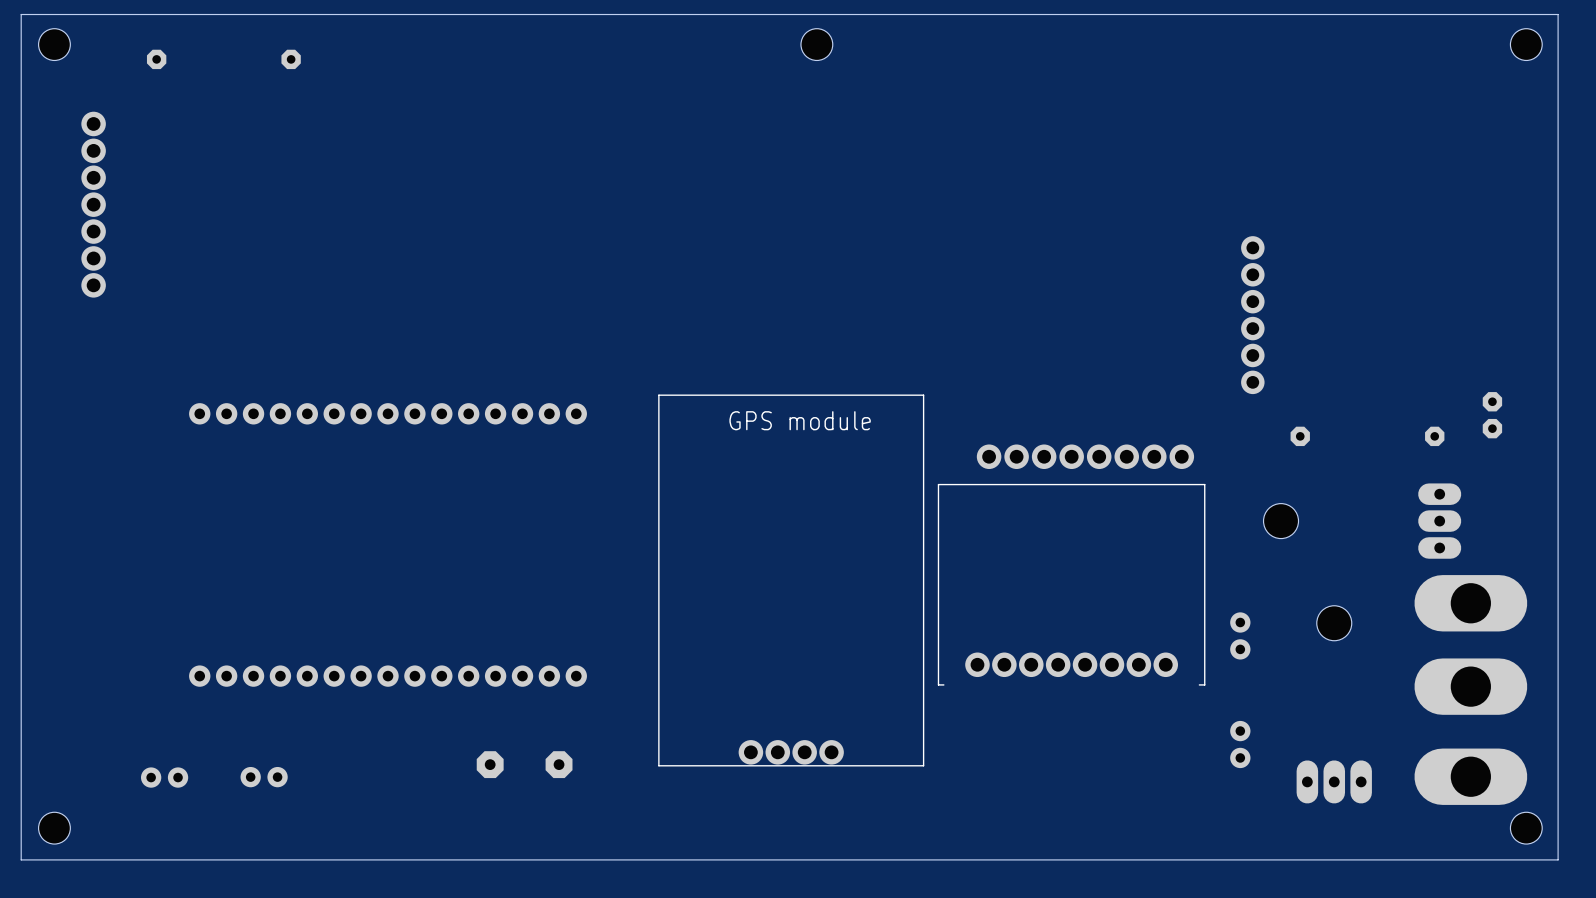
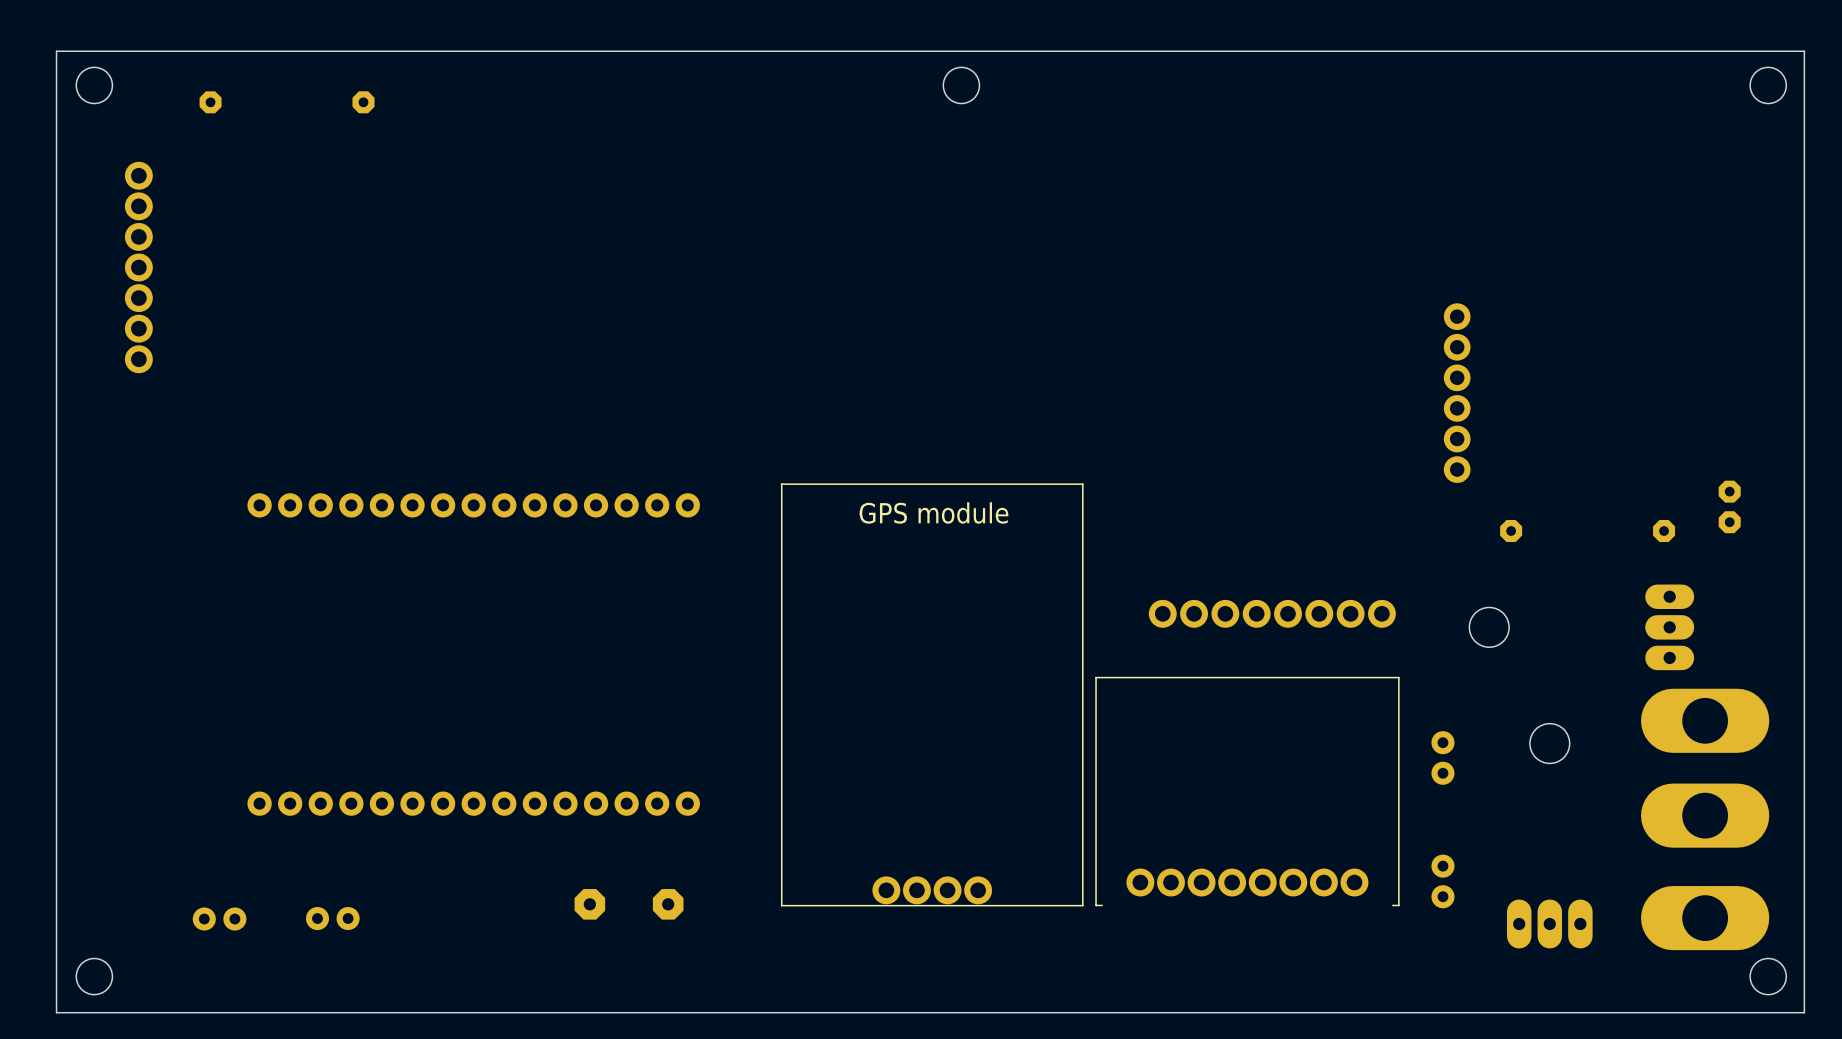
part position: (1085, 456) -> (1272, 613)
part position: (1071, 584) -> (1247, 791)

